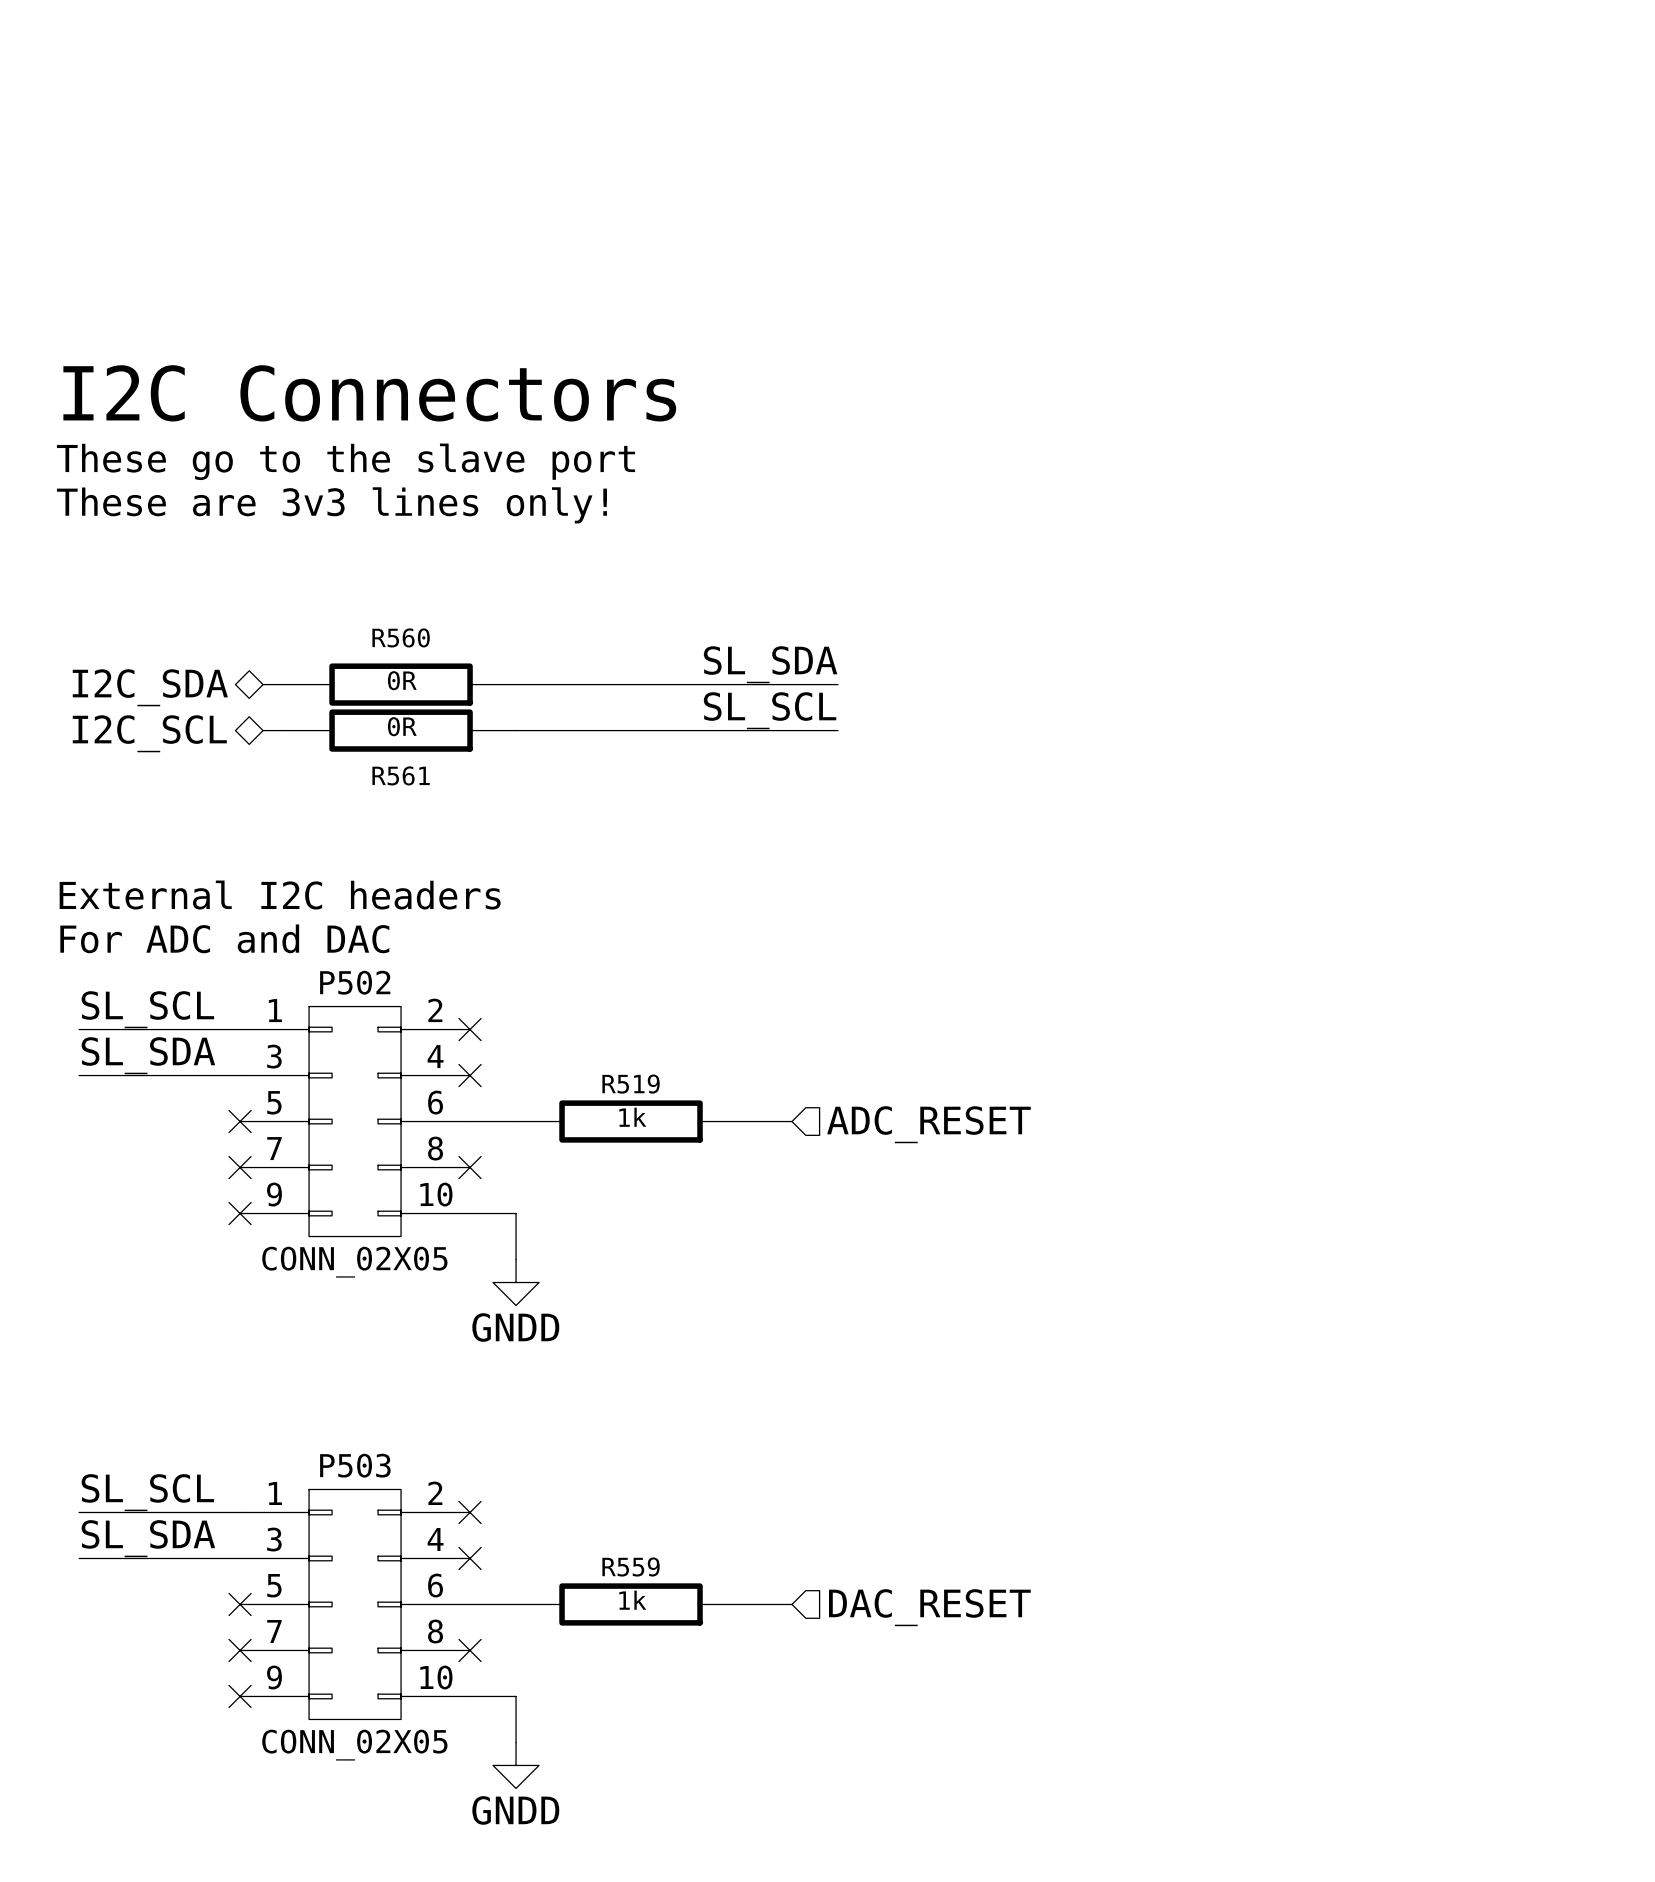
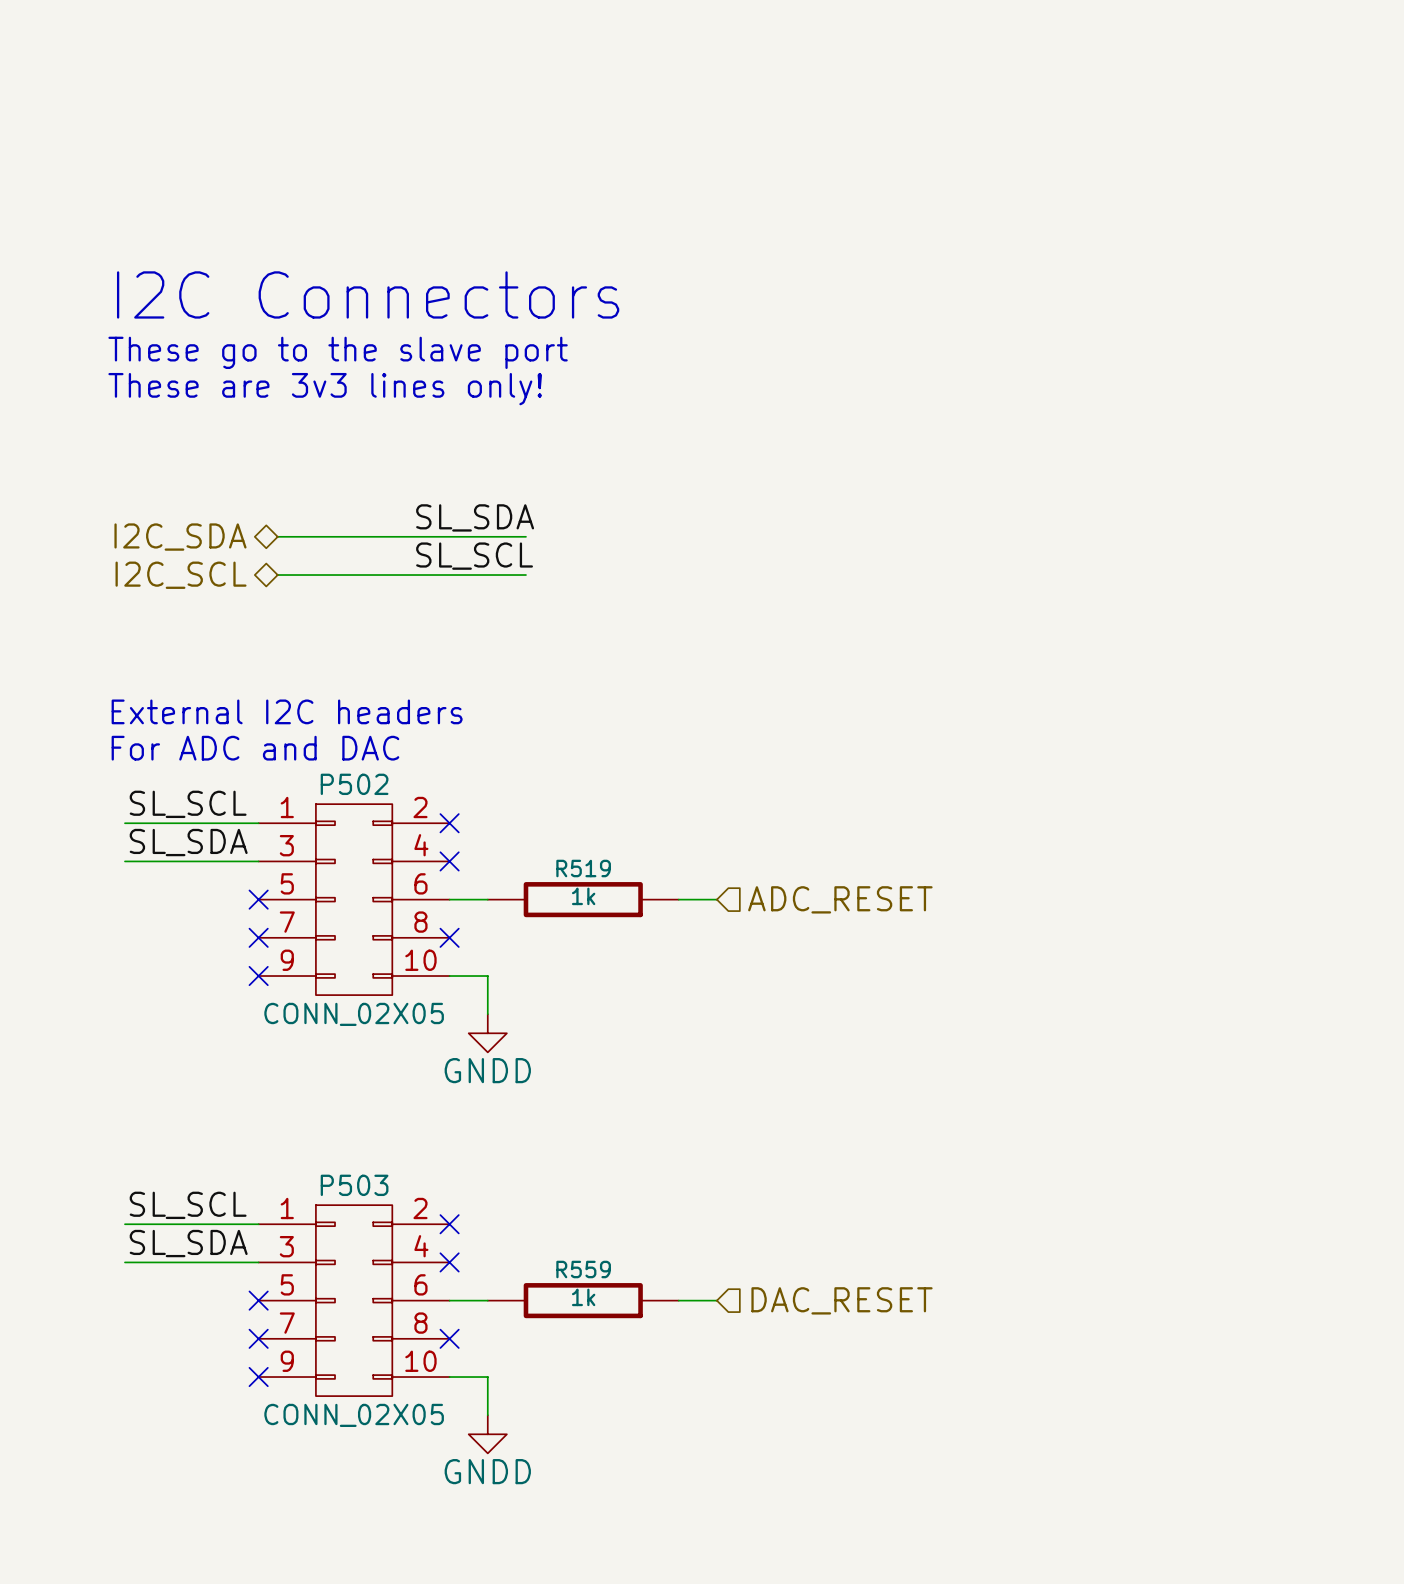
label position: SL_SDA (770, 664) -> SL_SDA (475, 517)
wire: none -> (296, 536) (487, 536)
R560: 0R (401, 684) -> none
wire: (562, 684) (837, 684) -> none
label position: SL_SCL (770, 710) -> SL_SCL (474, 556)
wire: none -> (296, 575) (487, 575)
R561: 0R (401, 730) -> none
wire: (562, 730) (837, 730) -> none

